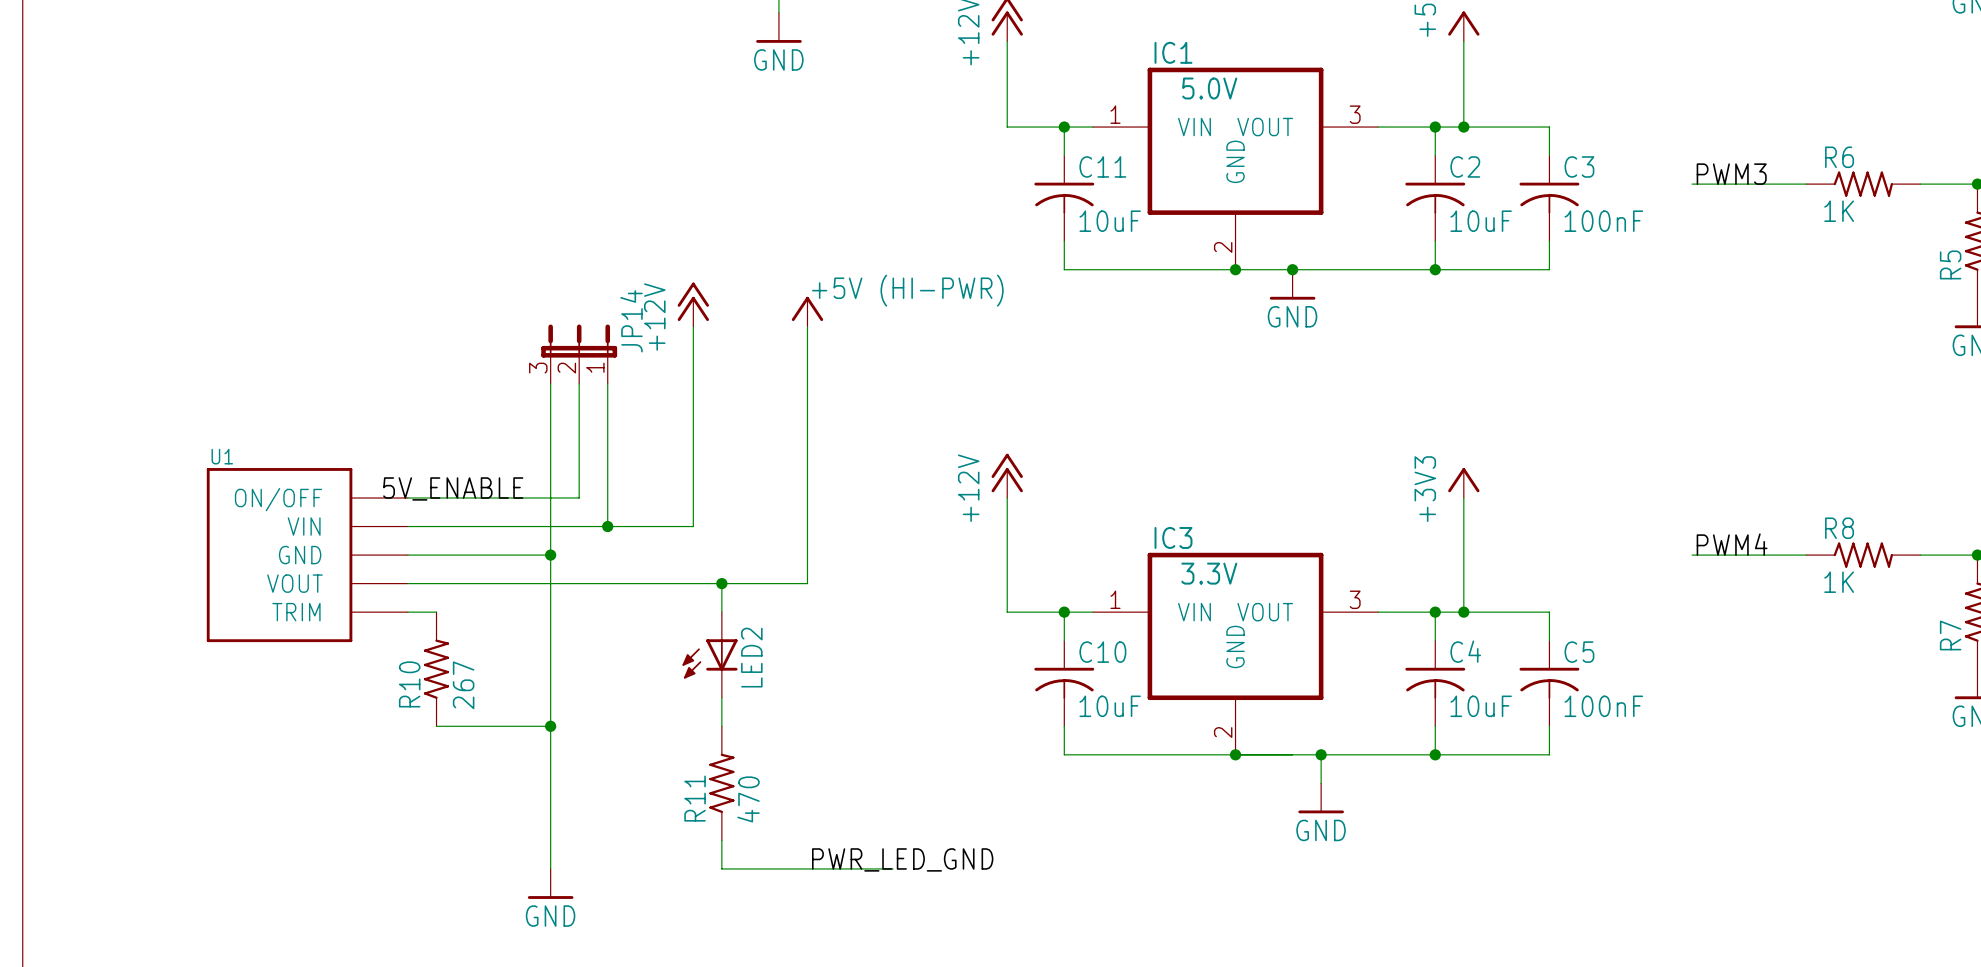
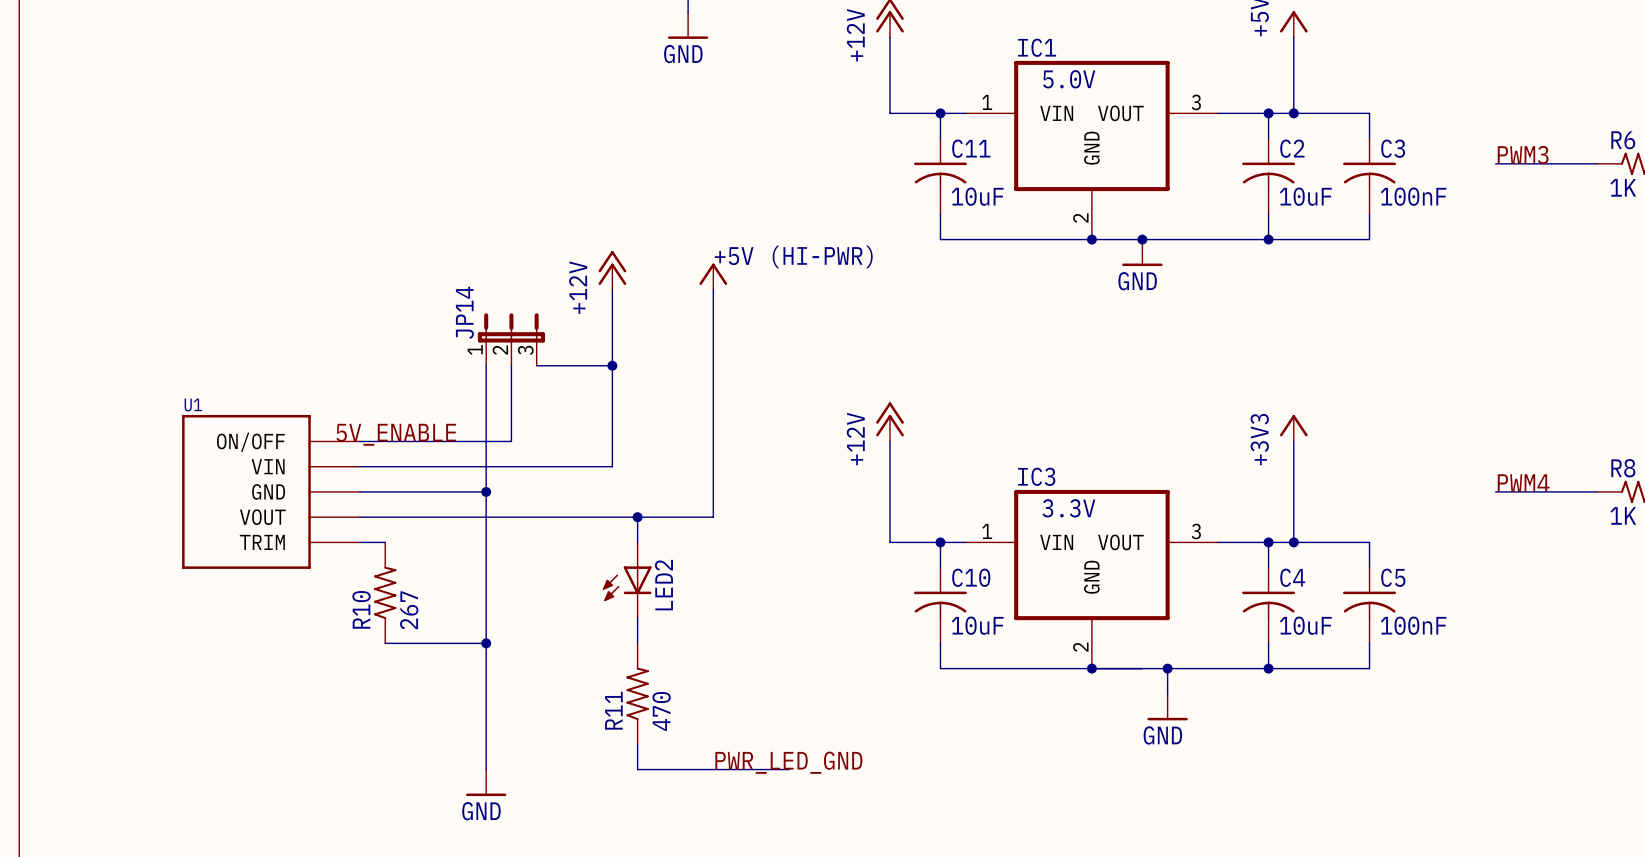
JP14 flip: as is (579, 341) -> left-right (511, 327)
wire: (607, 383) (607, 526) -> none
wire: none -> (536, 365) (612, 365)
junction: none -> (612, 365)
junction: (607, 526) -> none

